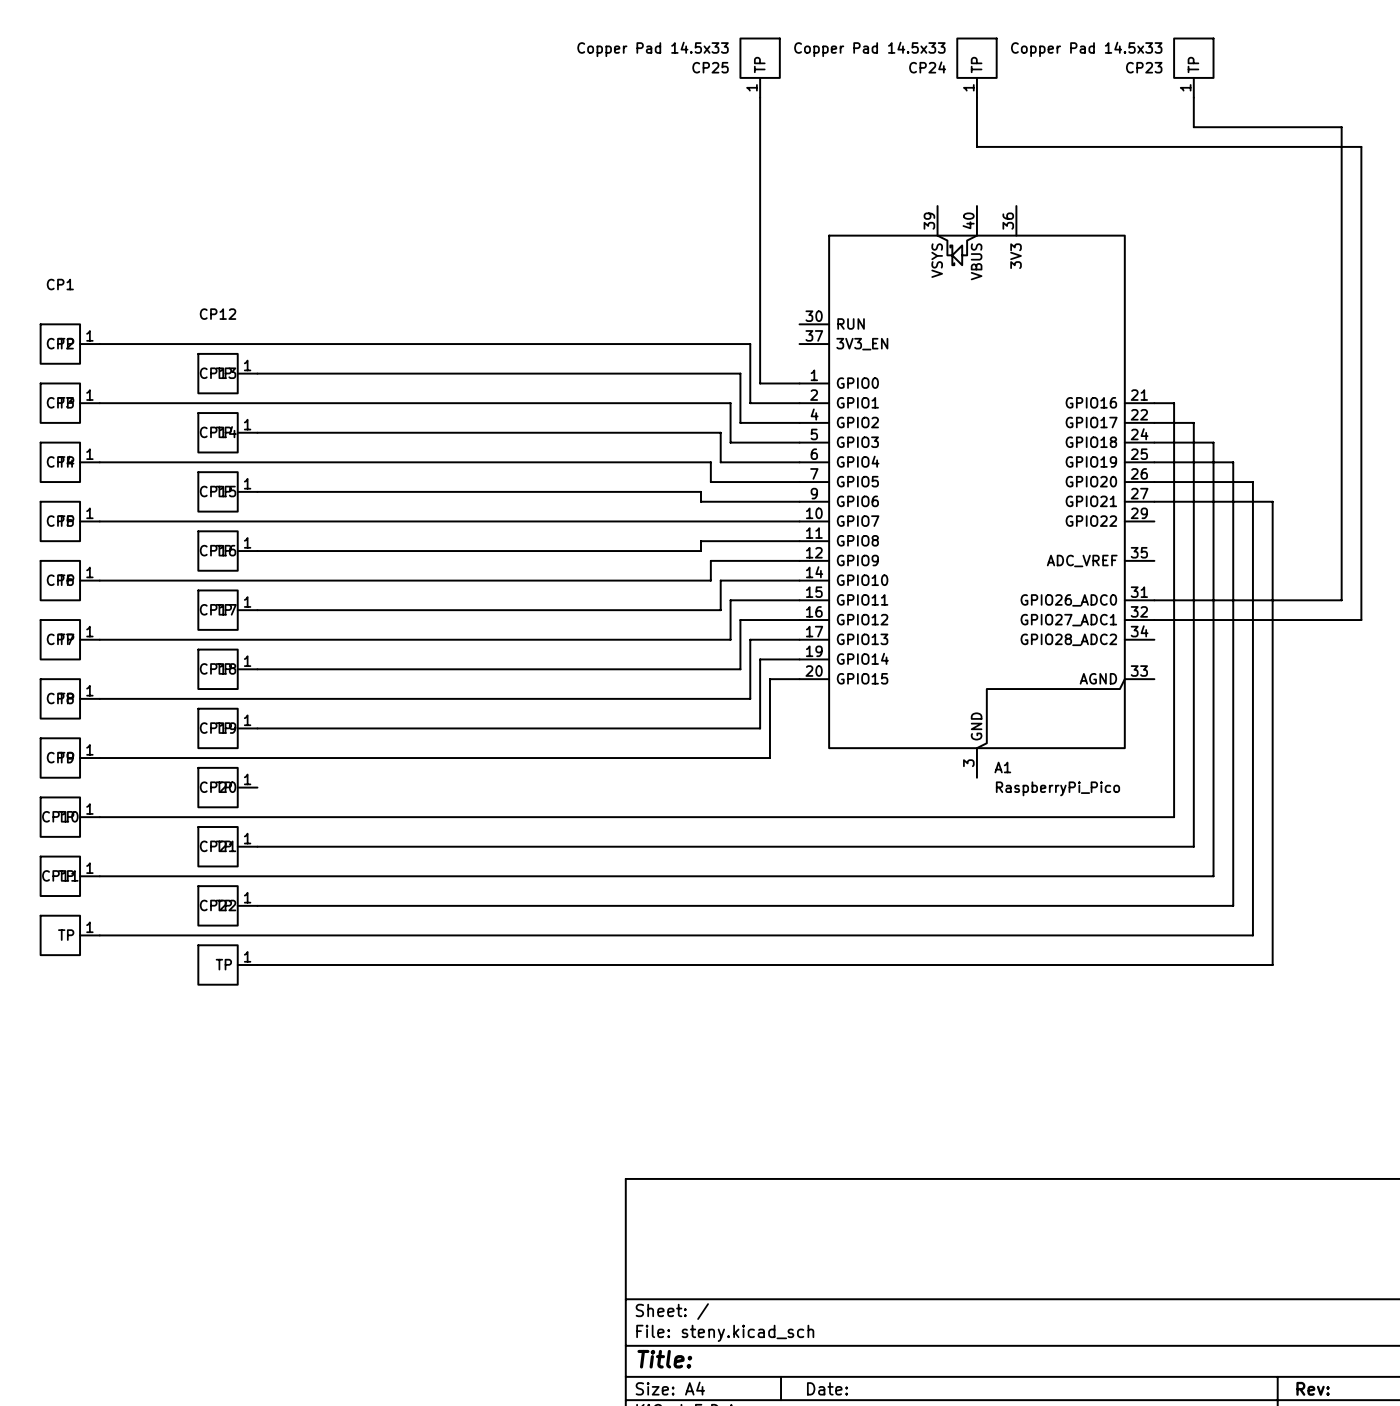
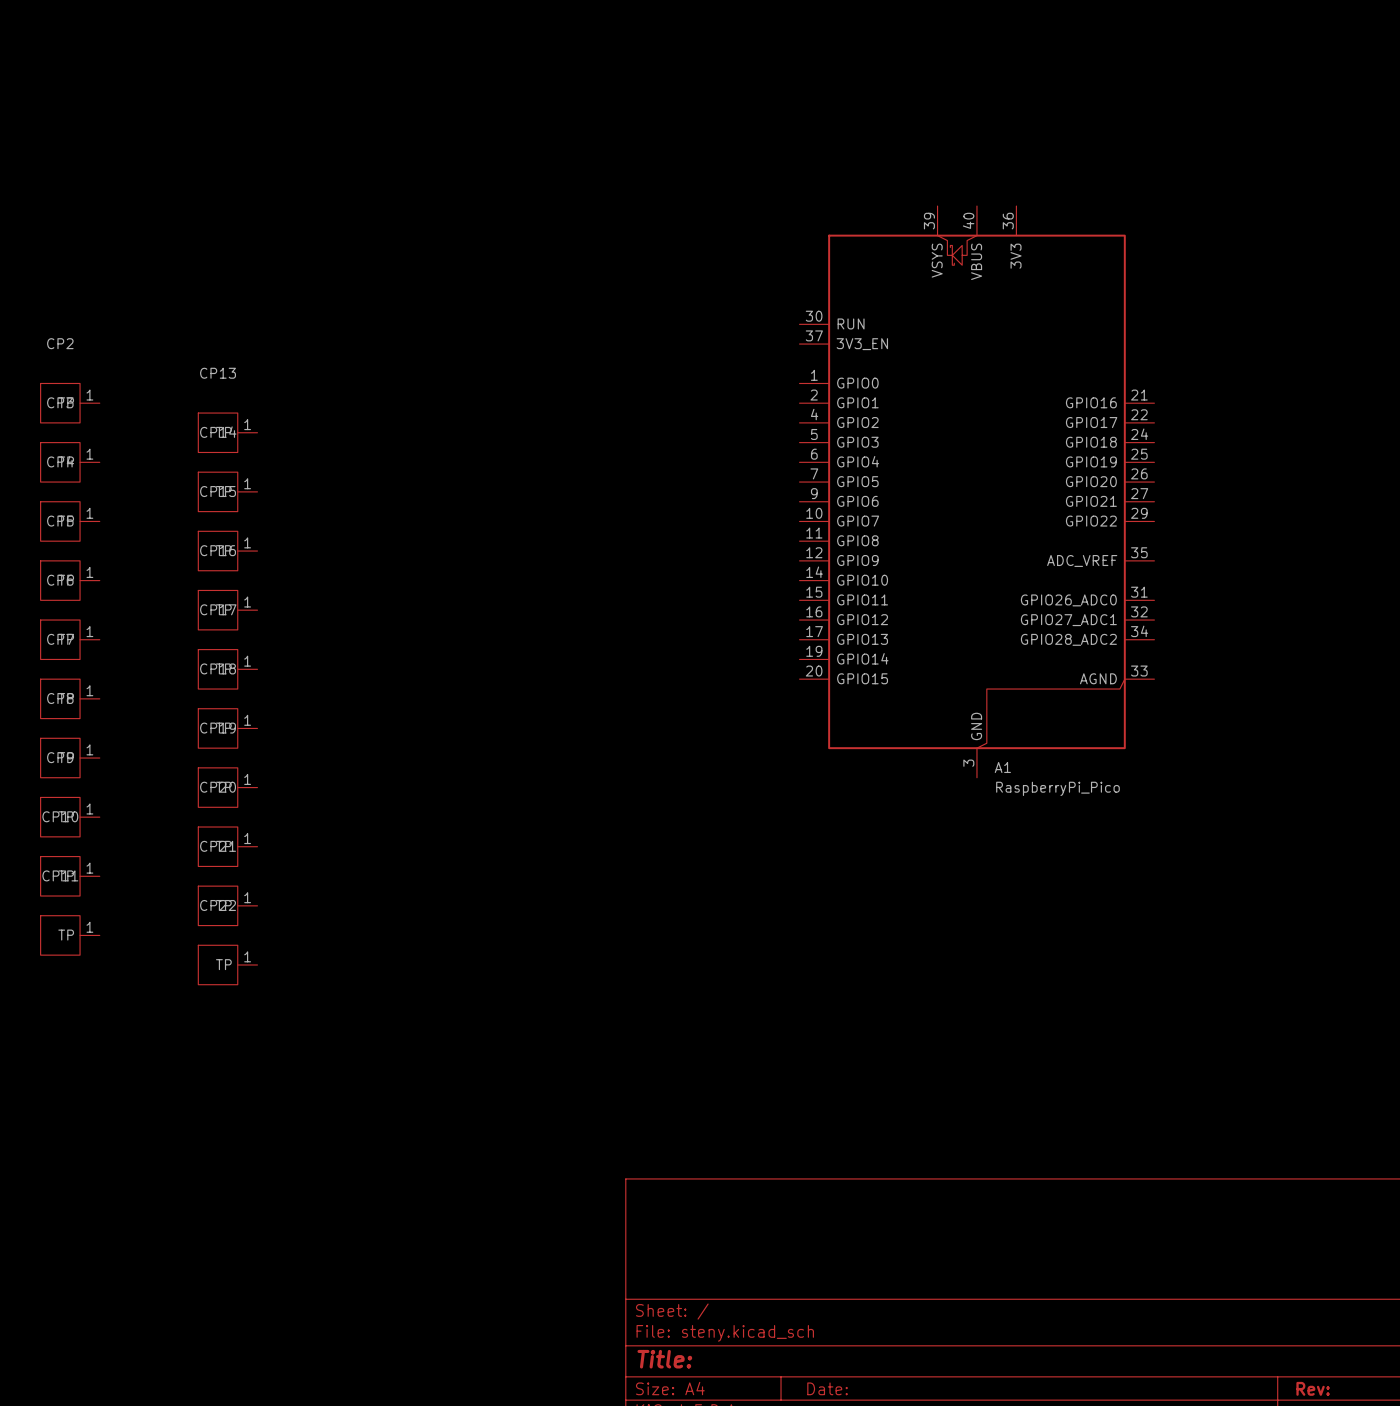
CP25: Copper Pad 14.5x33 (760, 68) -> none
CP24: Copper Pad 14.5x33 (976, 68) -> none
CP23: Copper Pad 14.5x33 (1193, 68) -> none
wire: (760, 97) (760, 383) (799, 383) -> none
wire: (976, 97) (976, 146) (1361, 146) (1361, 620) (1154, 620) -> none
wire: (1193, 97) (1193, 127) (1341, 127) (1341, 600) (1154, 600) -> none
CP1: (70, 344) -> none
wire: (99, 344) (750, 344) (750, 403) (799, 403) -> none
CP12: (227, 373) -> none
wire: (257, 373) (740, 373) (740, 422) (799, 422) -> none
wire: (99, 403) (730, 403) (730, 442) (799, 442) -> none
wire: (1154, 403) (1174, 403) (1174, 817) (99, 817) -> none
wire: (1154, 422) (1193, 422) (1193, 846) (257, 846) -> none
wire: (257, 432) (720, 432) (720, 462) (799, 462) -> none
wire: (1154, 442) (1213, 442) (1213, 876) (99, 876) -> none
wire: (99, 462) (710, 462) (710, 482) (799, 482) -> none
wire: (1154, 462) (1233, 462) (1233, 905) (257, 905) -> none
wire: (1154, 482) (1252, 482) (1252, 935) (99, 935) -> none
wire: (257, 491) (700, 491) (700, 501) (799, 501) -> none
wire: (1154, 501) (1272, 501) (1272, 964) (257, 964) -> none
wire: (99, 521) (799, 521) -> none
wire: (799, 541) (700, 541) (700, 551) (257, 551) -> none
wire: (799, 560) (710, 560) (710, 580) (99, 580) -> none
wire: (799, 580) (720, 580) (720, 610) (257, 610) -> none
wire: (799, 600) (730, 600) (730, 639) (99, 639) -> none
wire: (799, 620) (740, 620) (740, 669) (257, 669) -> none
wire: (799, 639) (750, 639) (750, 698) (99, 698) -> none
wire: (799, 659) (760, 659) (760, 728) (257, 728) -> none
wire: (799, 679) (769, 679) (769, 758) (99, 758) -> none

